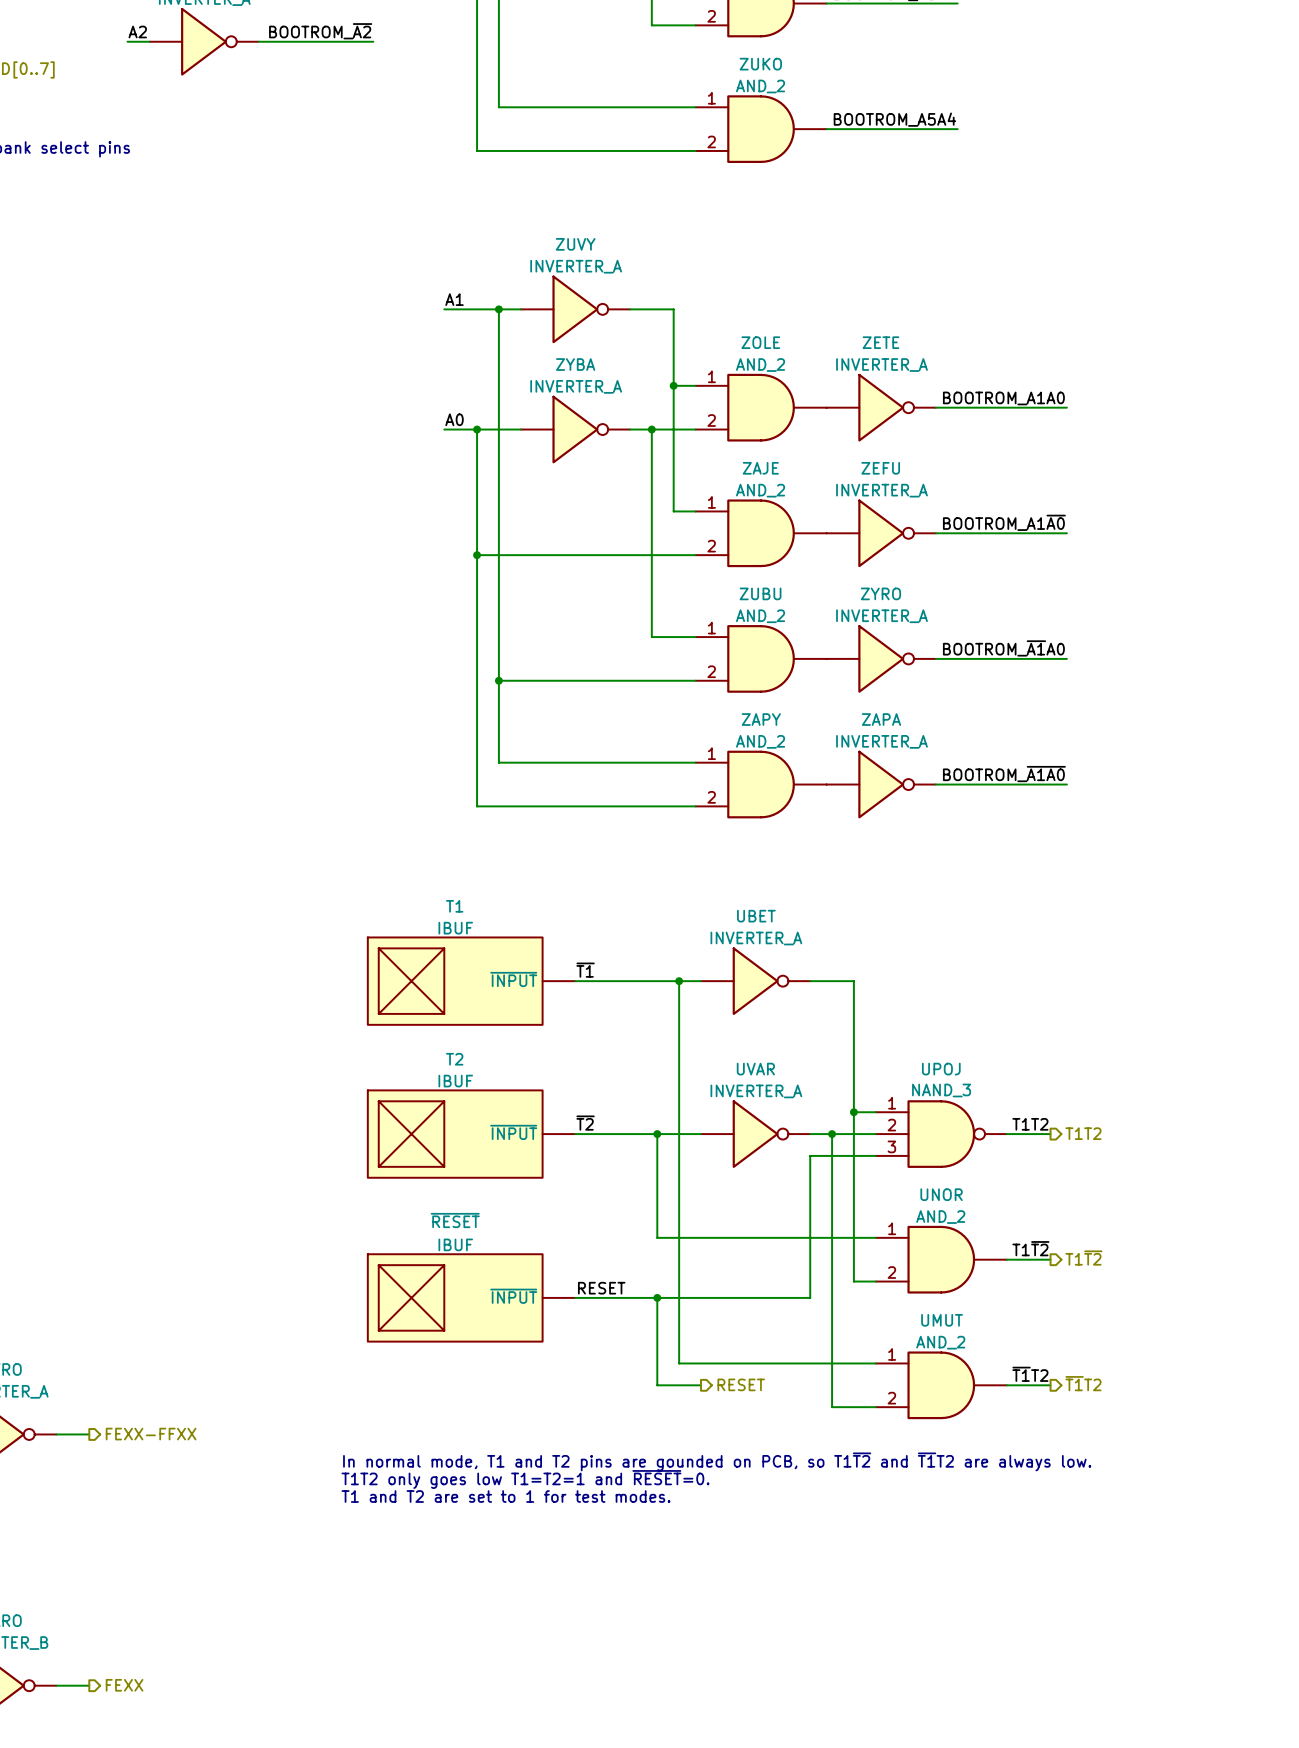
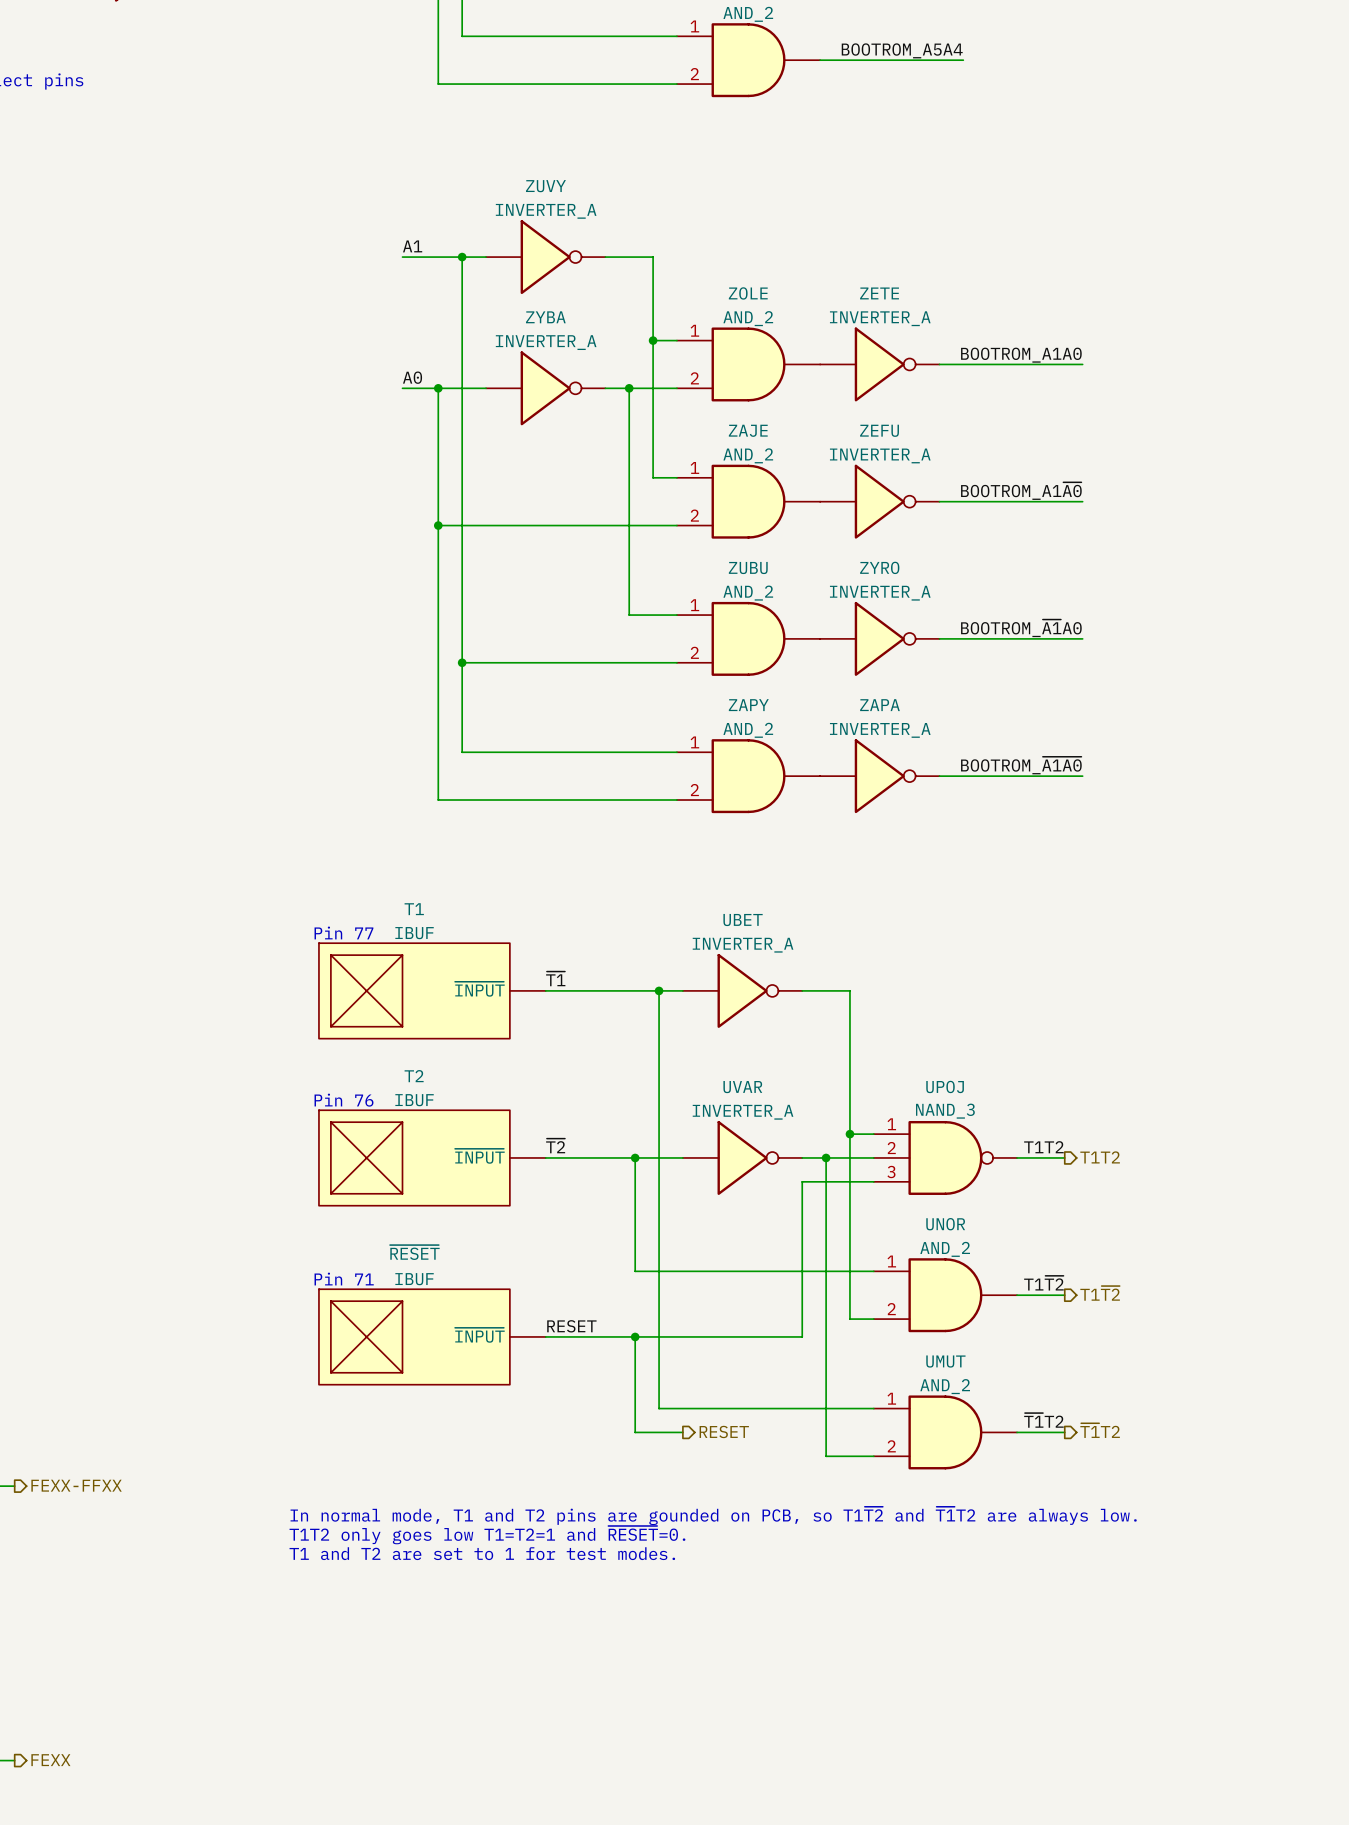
text: none -> Pin 77 (343, 932)
text: none -> Pin 76 (343, 1100)
text: none -> Pin 71 (344, 1279)

